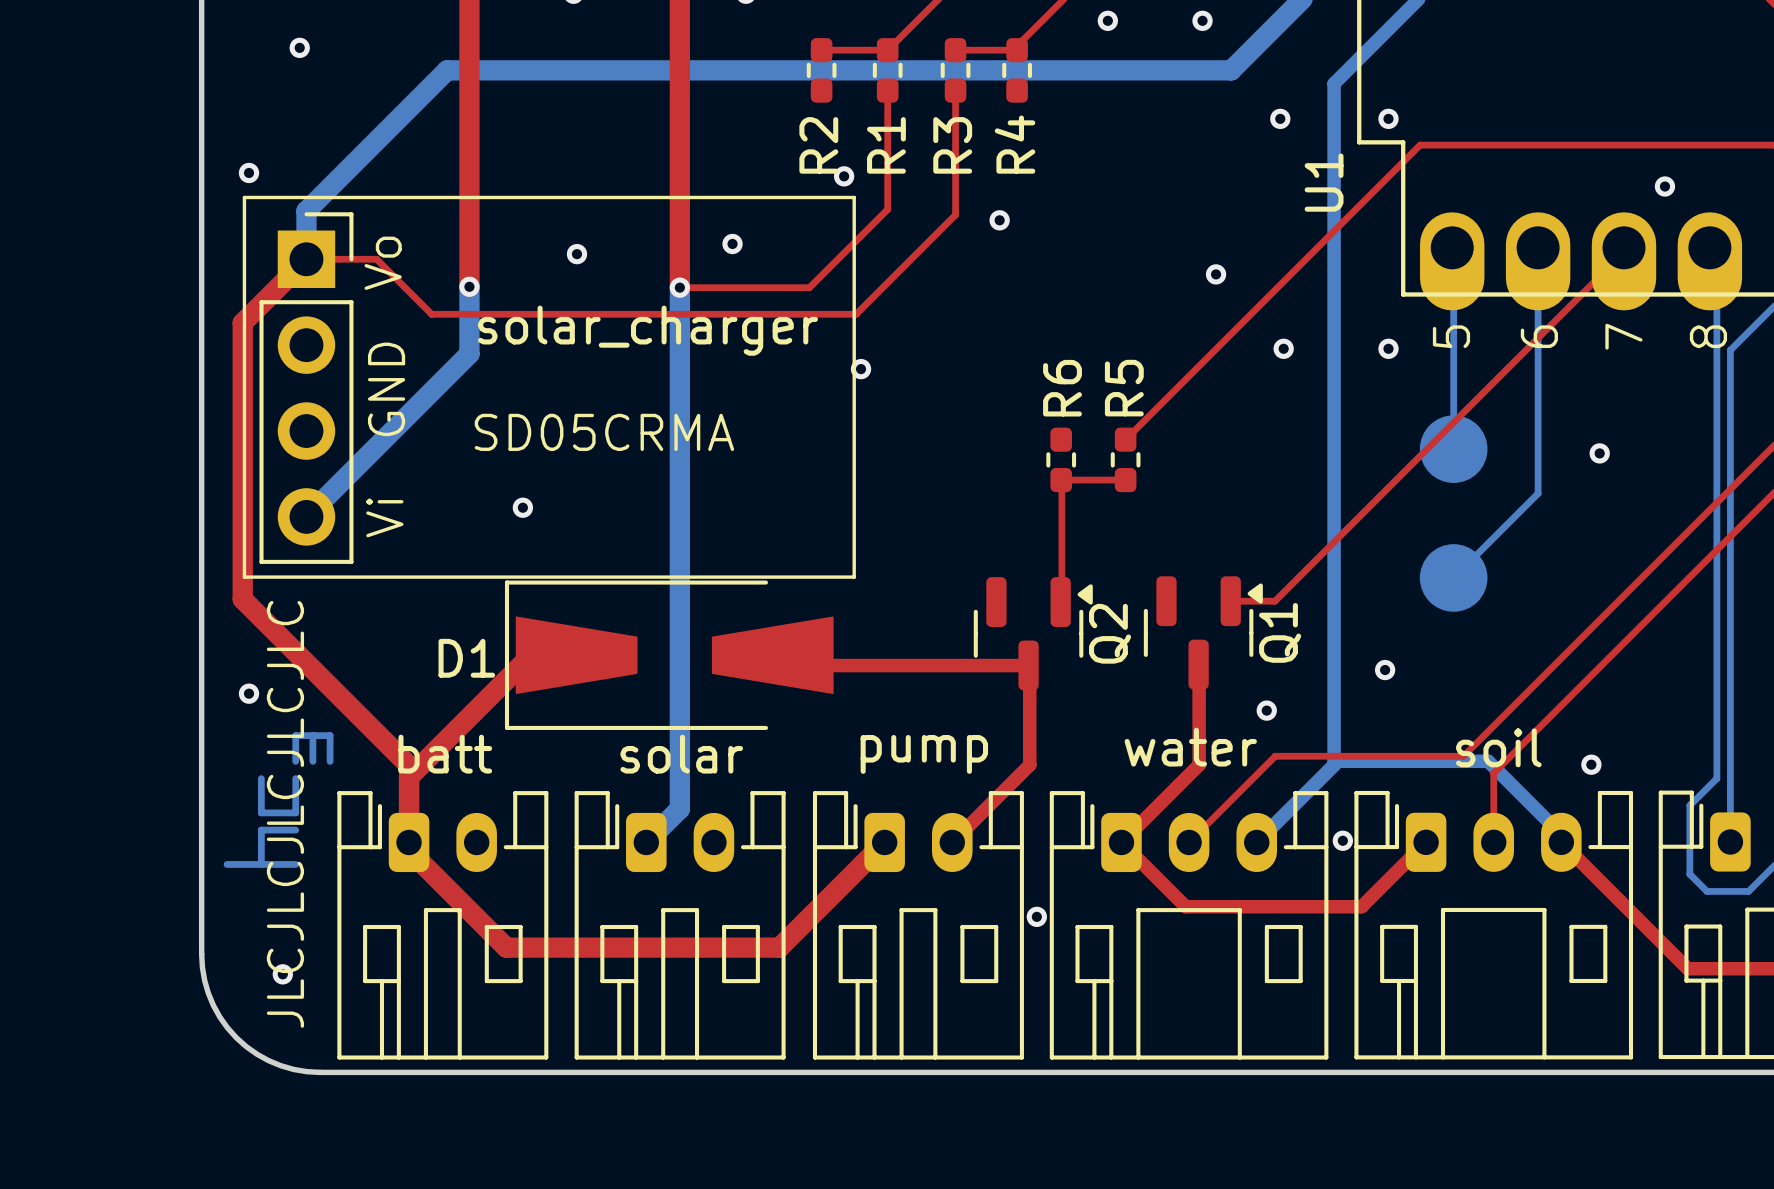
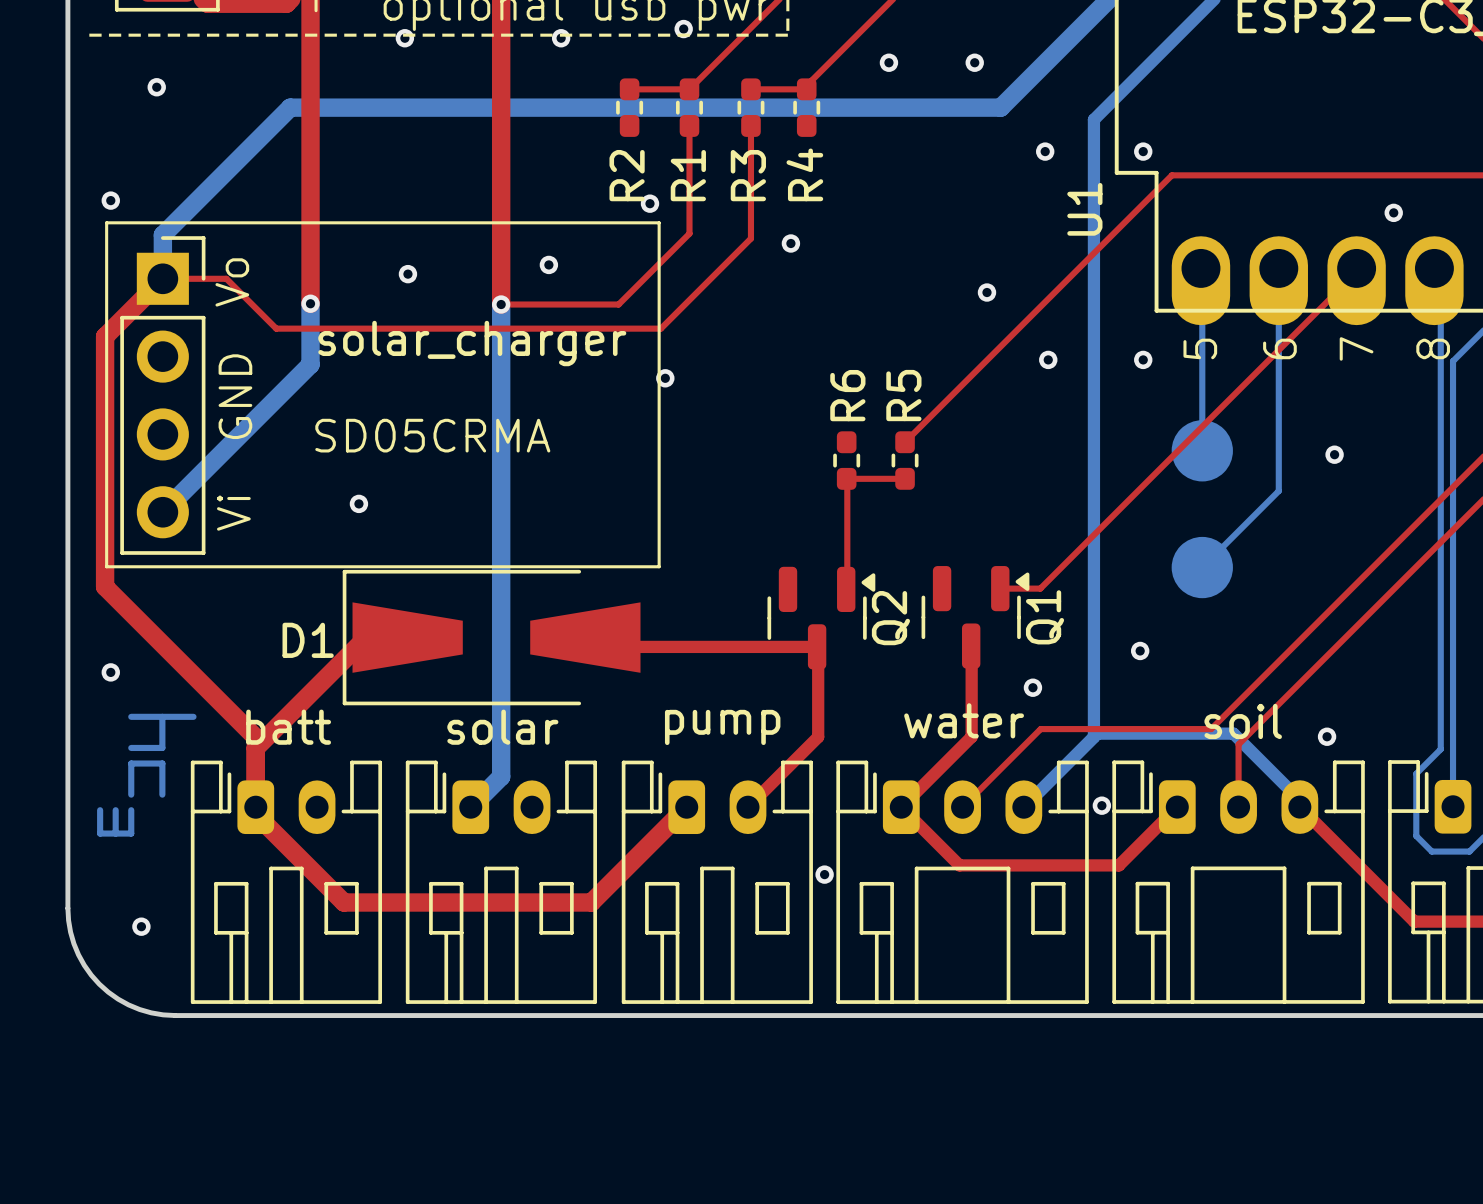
drawing shape: [223, 732, 334, 868] -> [97, 713, 197, 837]
text: JLCJLCJLCJLCJLC (285, 814) -> none

